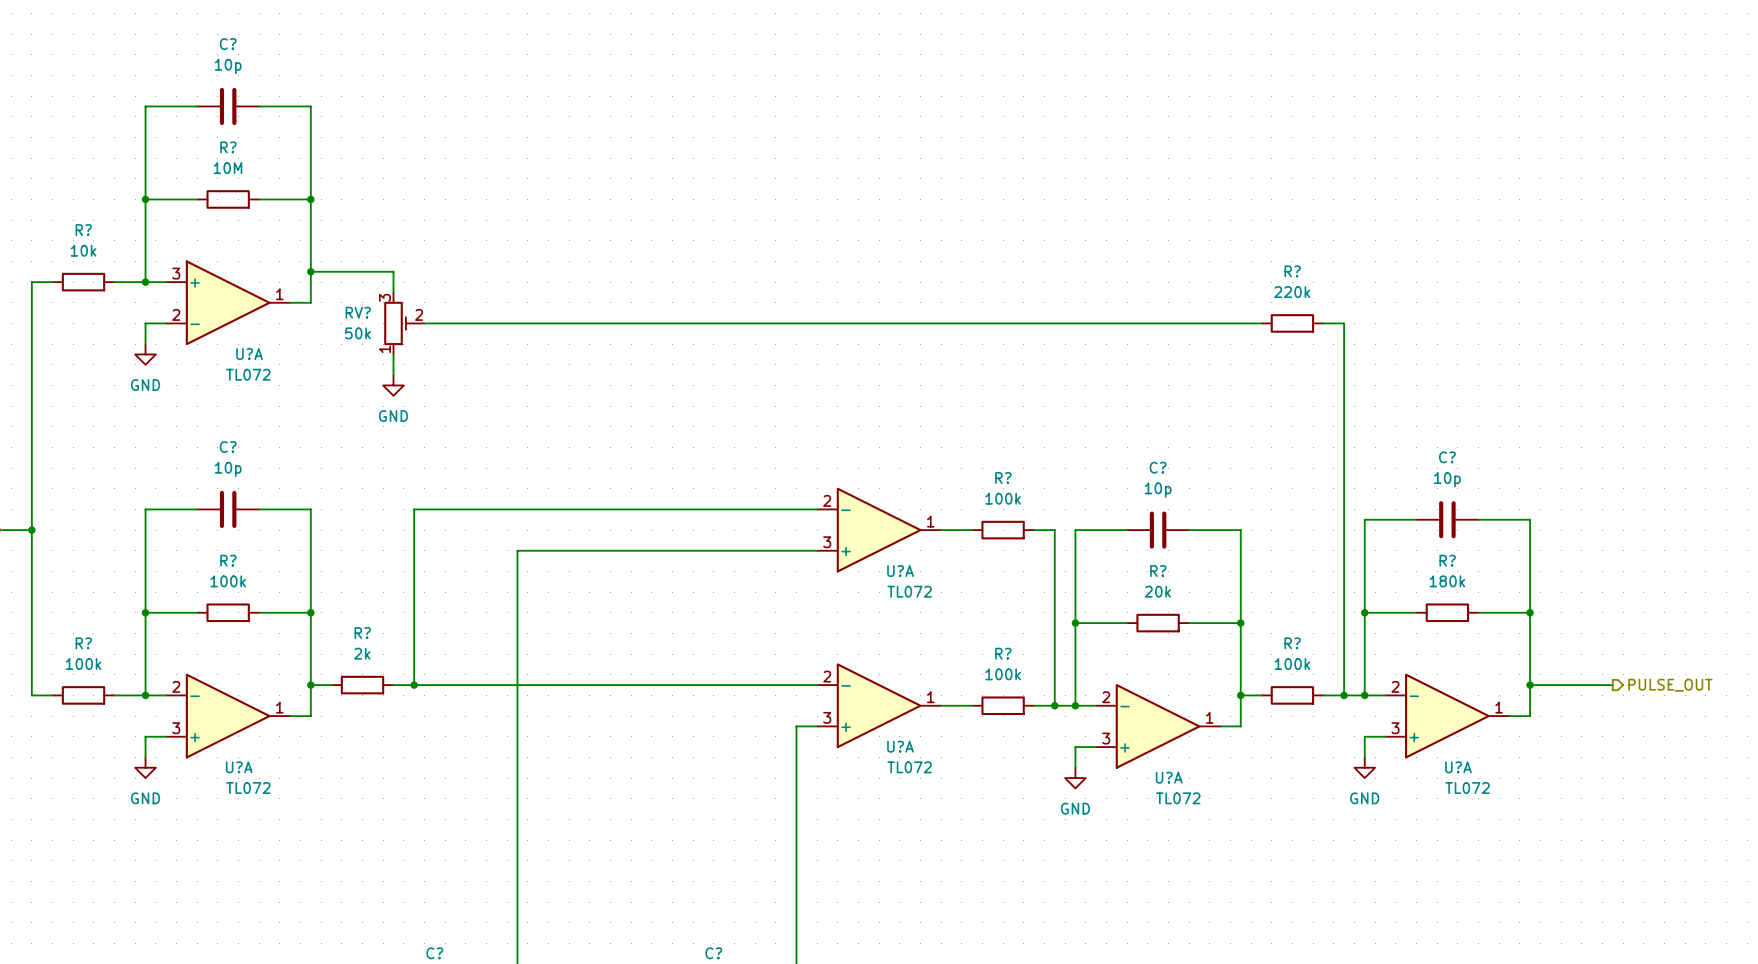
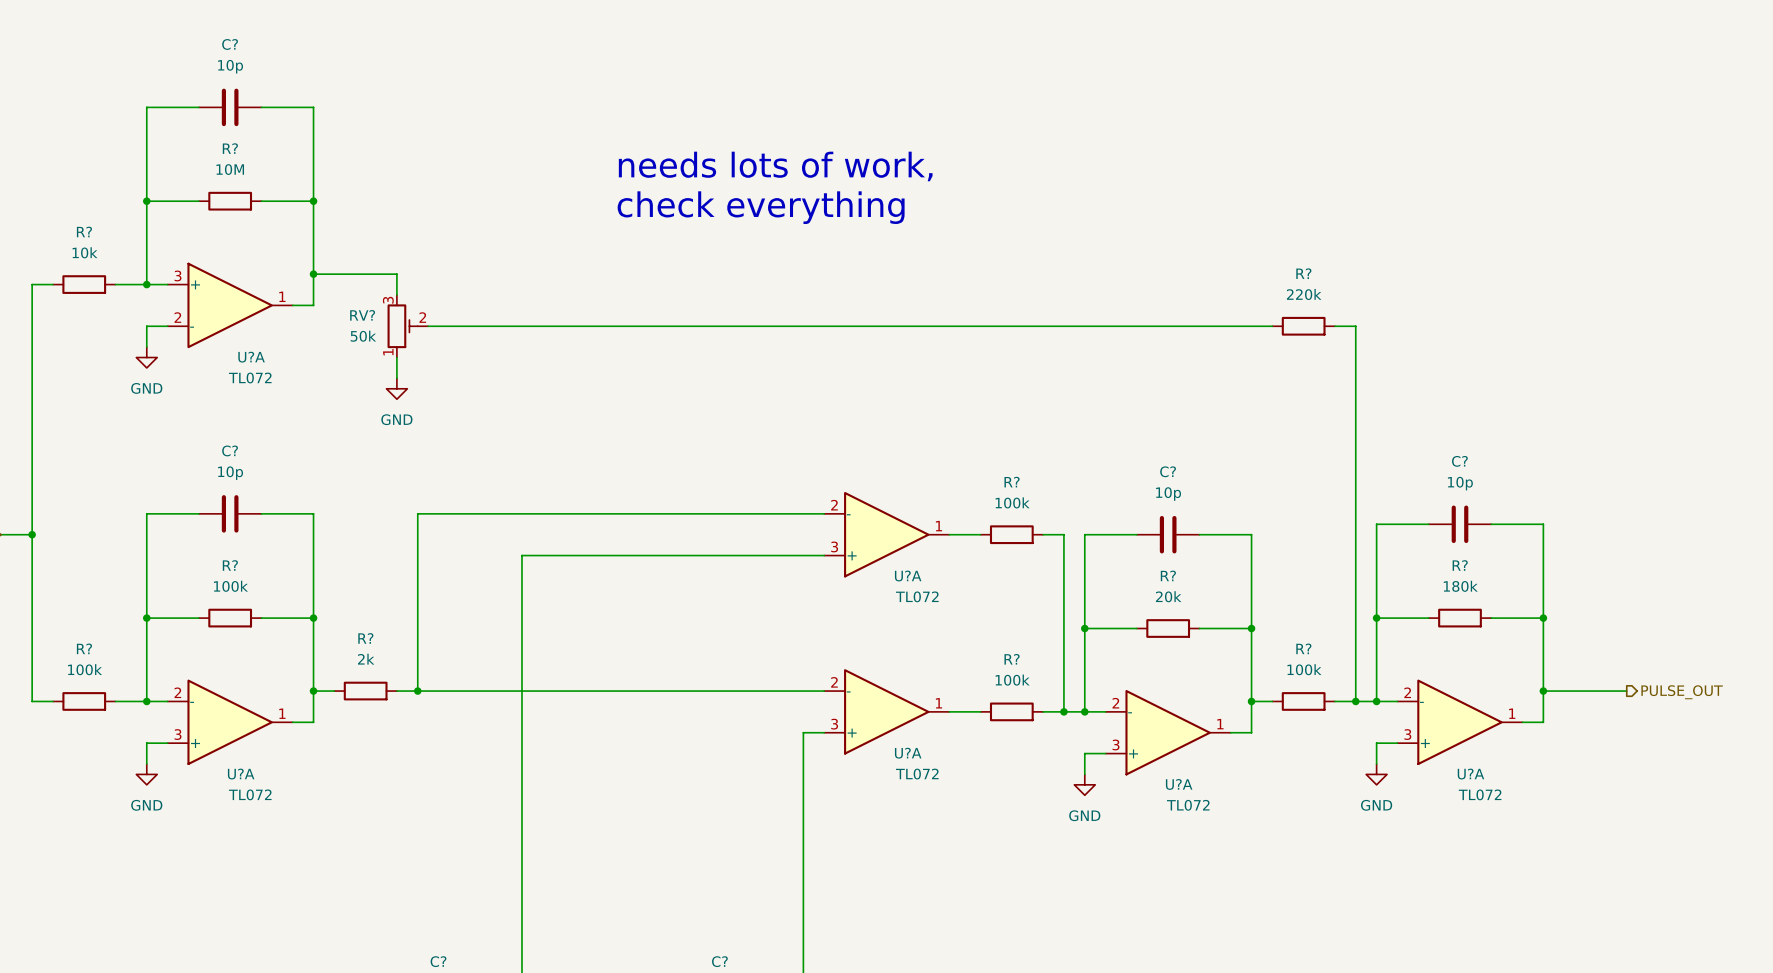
text: none -> needs lots of work, (775, 166)
text: none -> check everything (761, 207)

